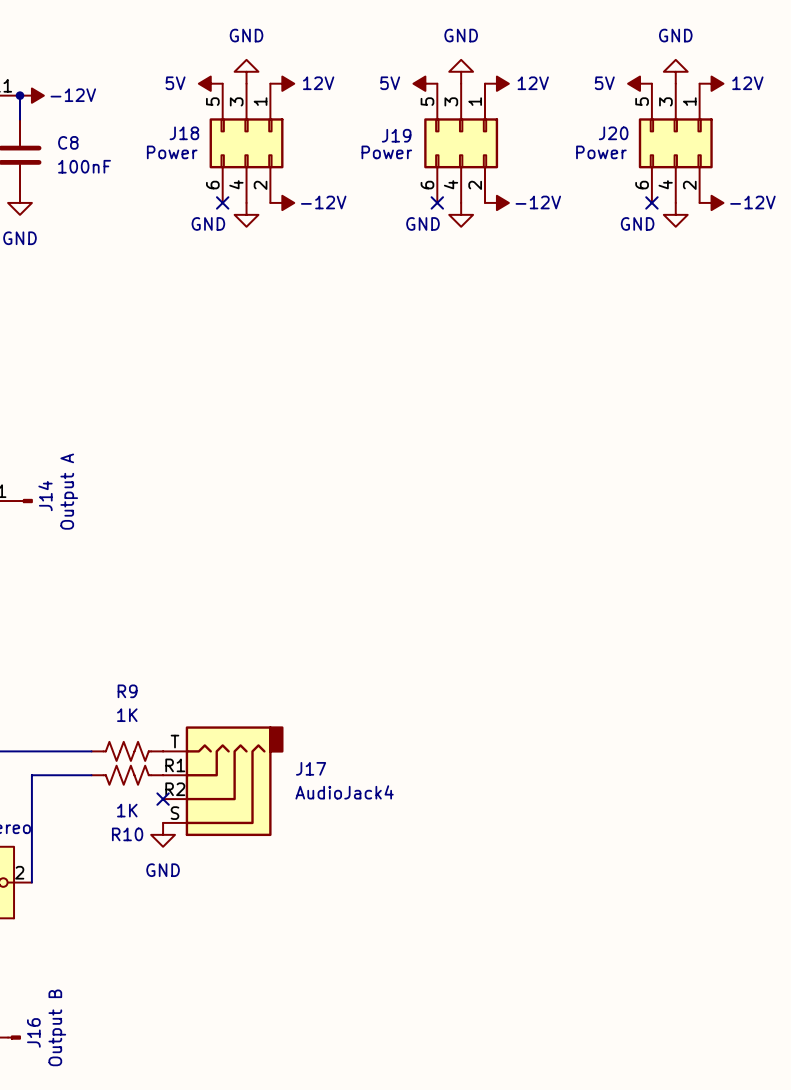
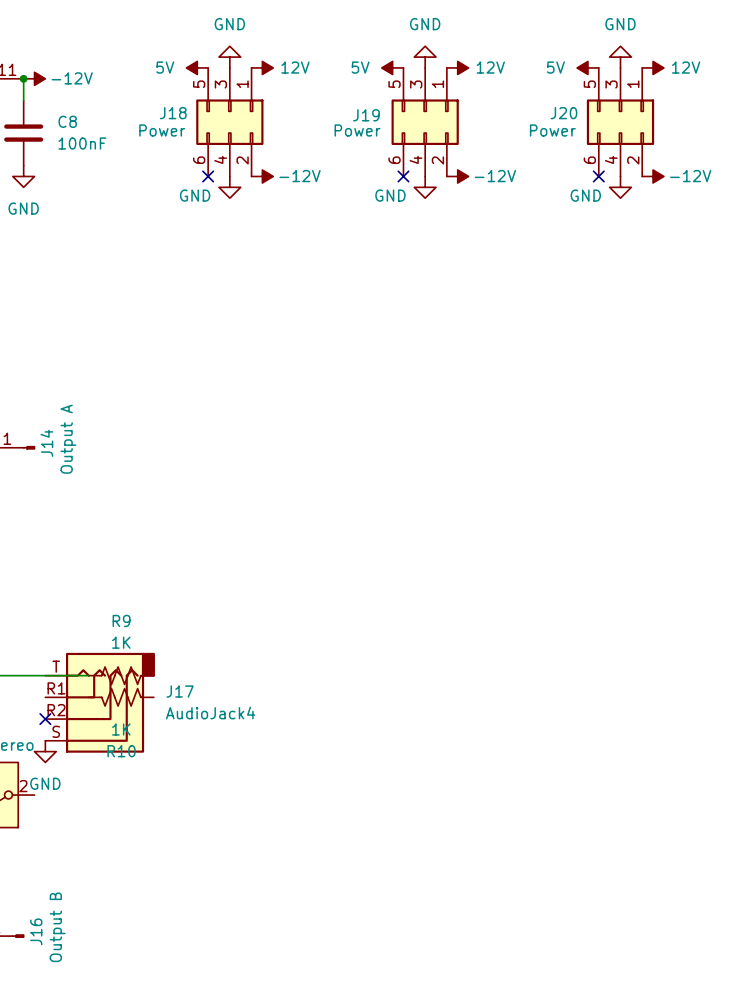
wire: (91, 775) (31, 775) (31, 882) -> none
J17 position: (223, 781) -> (100, 702)
no-connect mark: none -> (45, 719)
no-connect mark: (163, 799) -> none
power symbol position: GND (163, 834) -> GND (45, 751)

